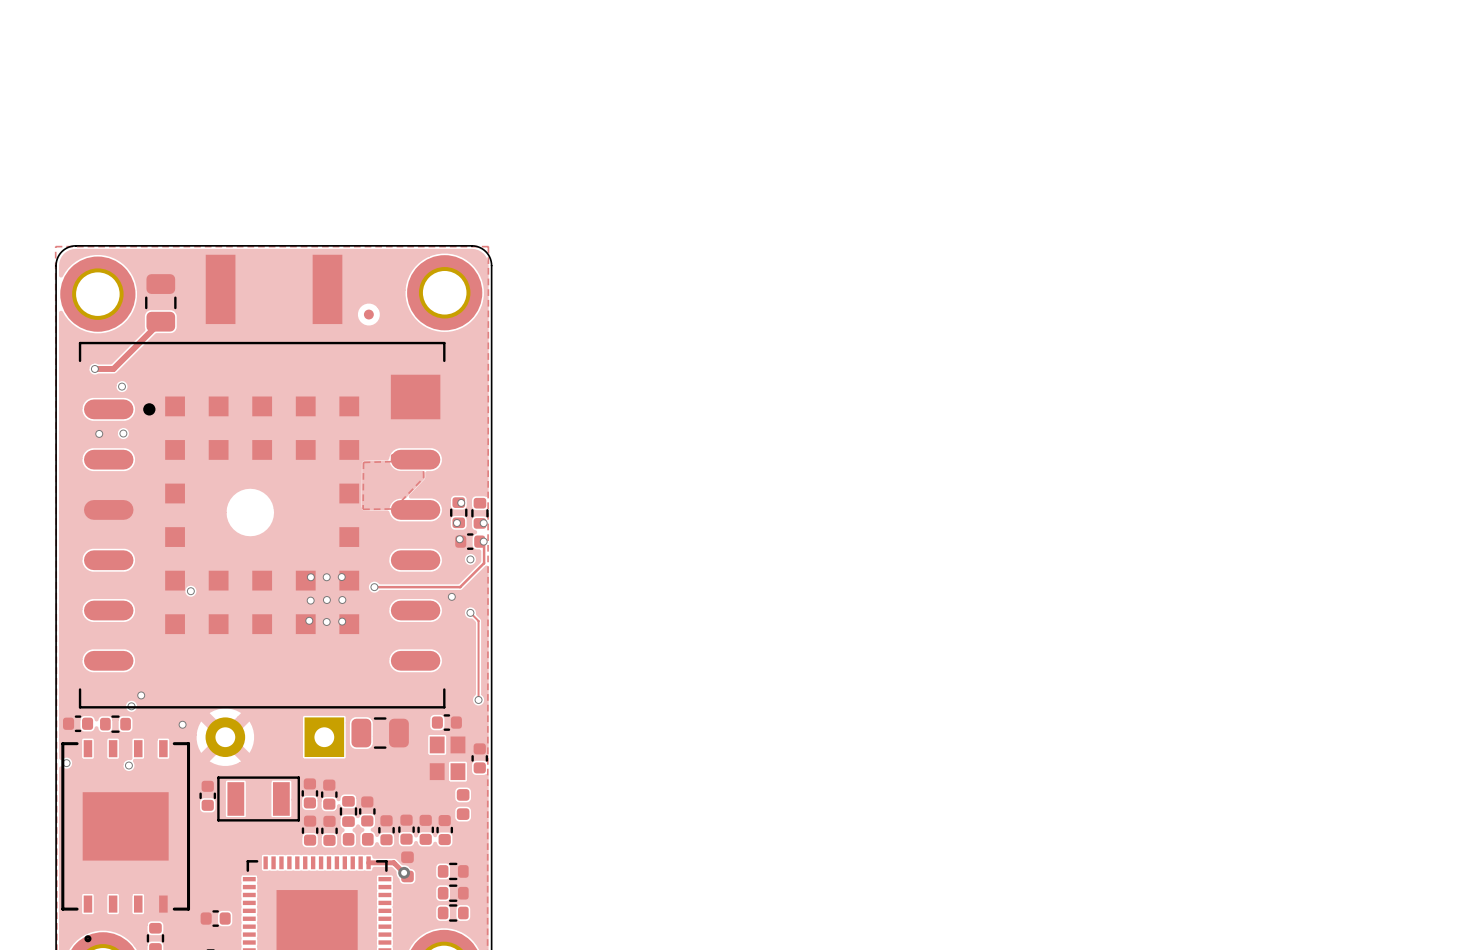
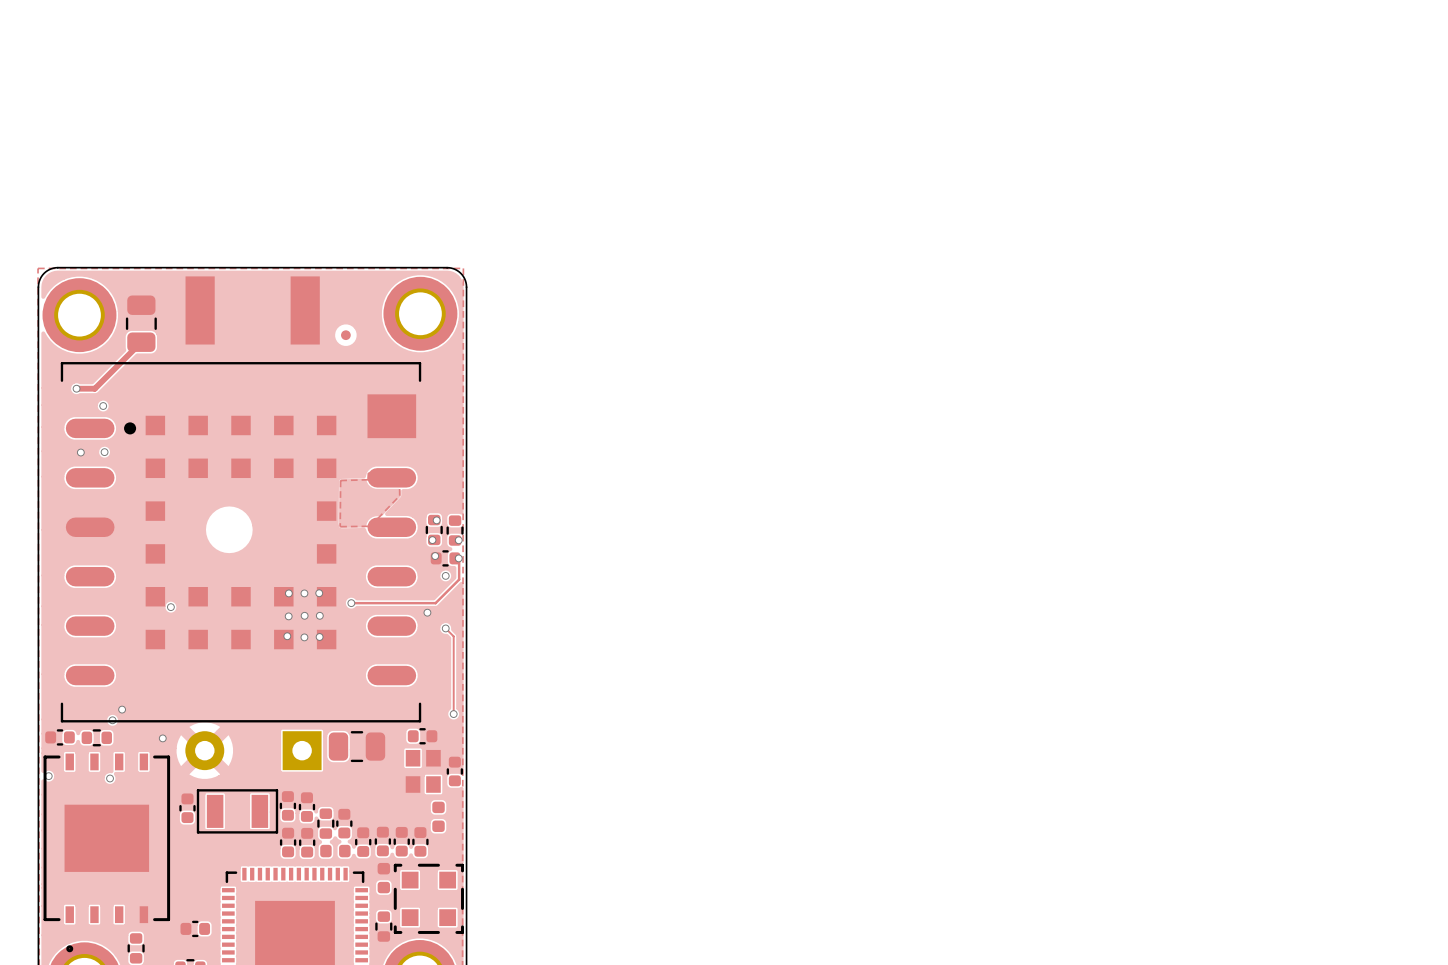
track: (368, 862) (393, 862) (407, 876) (404, 872) -> none
part: (453, 871) -> none
via: (404, 872) -> none
part footprint: [437, 884, 469, 902] -> [393, 863, 464, 934]
part: (453, 913) -> none
part: none -> (383, 926)

